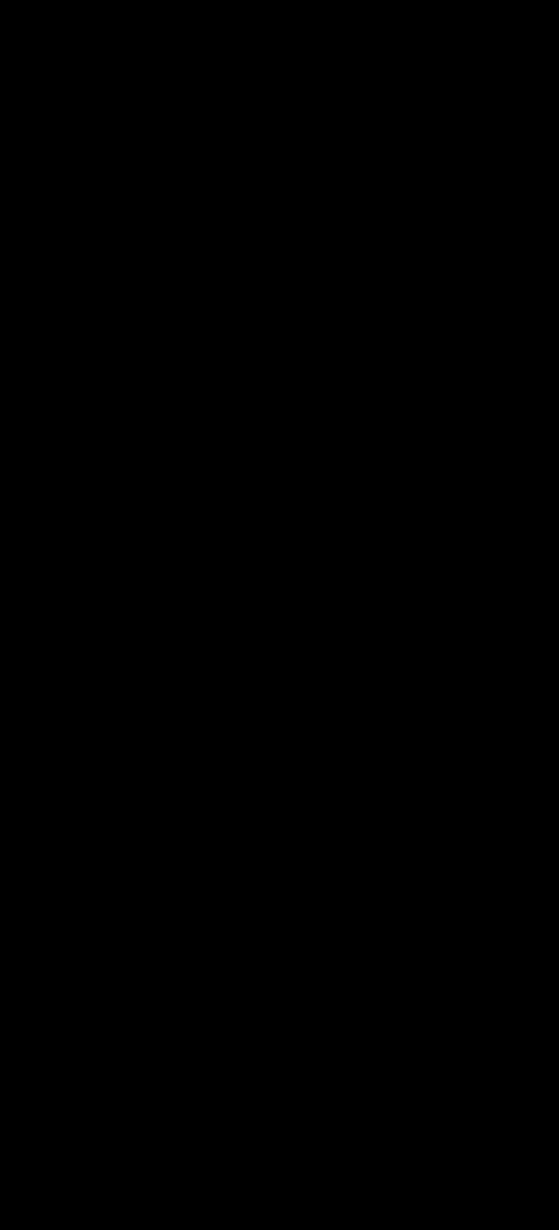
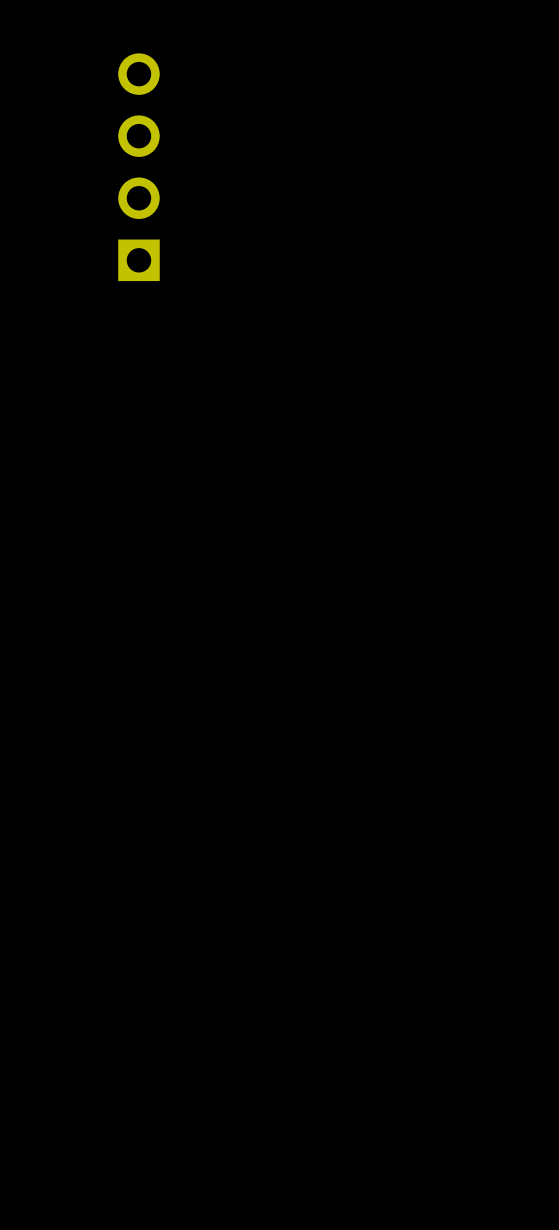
part: none -> (138, 167)

